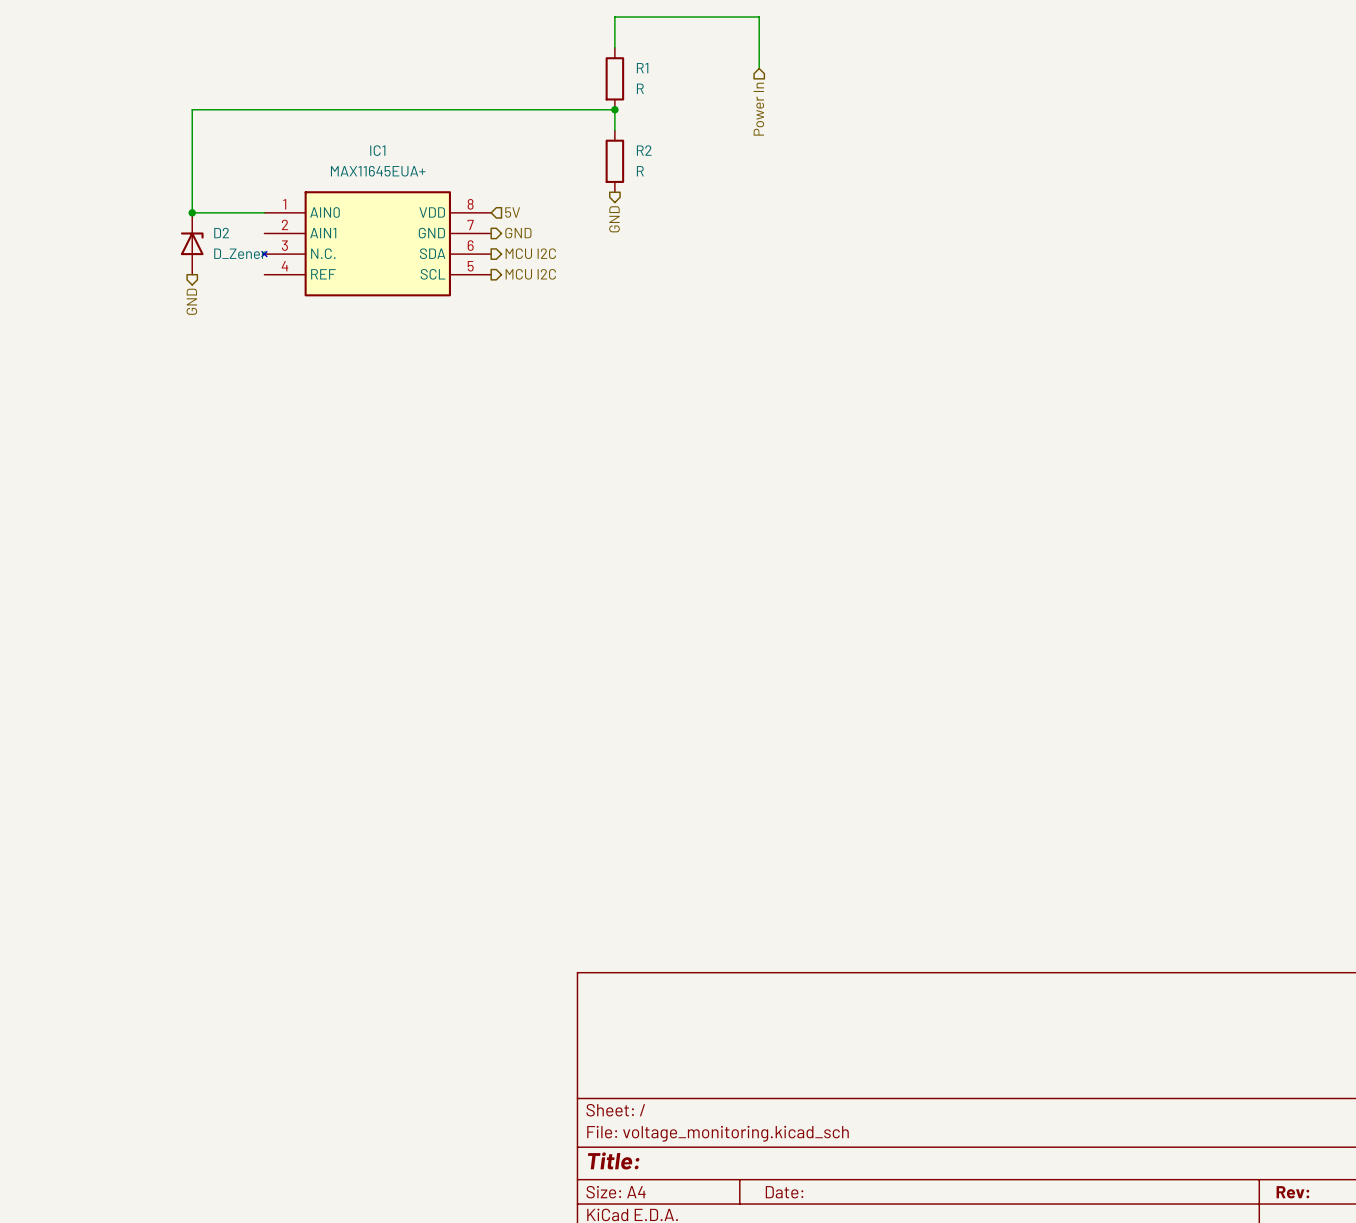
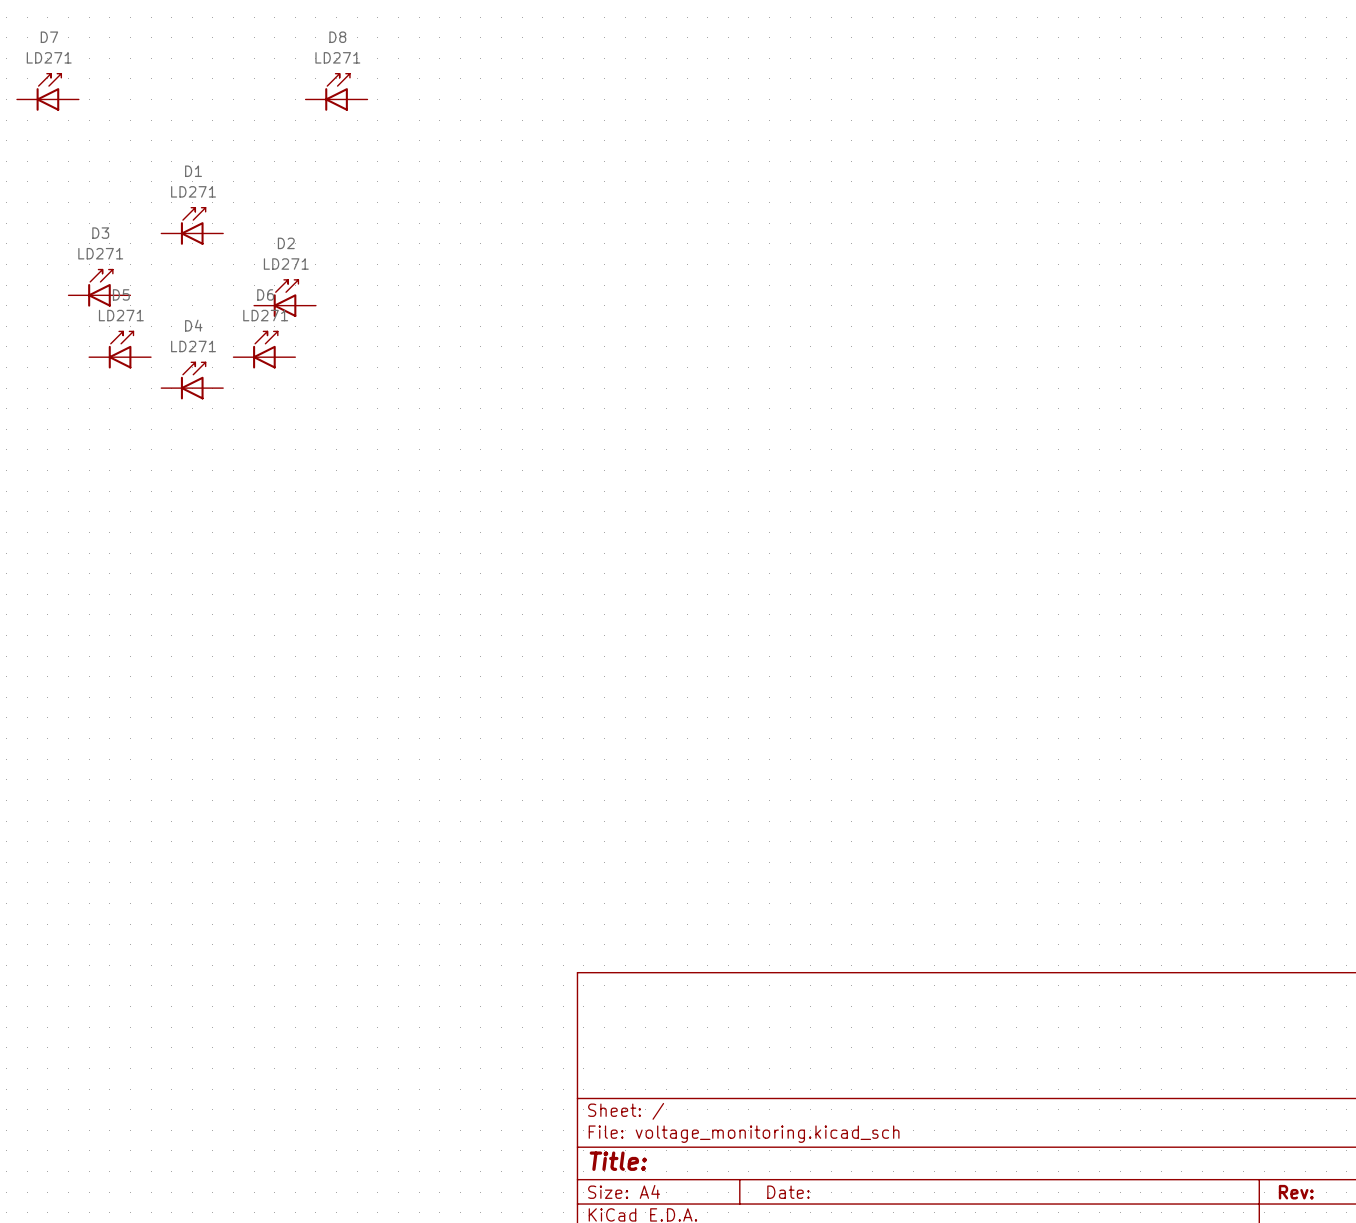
wire: (614, 47) (614, 17) (759, 17) (759, 68) -> none
R1: R (614, 78) -> none
D7: none -> LD271 (47, 92)
D8: none -> LD271 (336, 92)
junction: (614, 109) -> none
hierarchical label: Power In (758, 109) -> none
wire: (614, 130) (614, 109) (192, 109) (192, 212) (264, 212) -> none
R2: R (614, 161) -> none
D2 symbol: [180, 212, 204, 275] -> [254, 279, 316, 317]
junction: (192, 212) -> none
hierarchical label: 5V (512, 212) -> none
hierarchical label: GND (614, 219) -> none
D1: none -> LD271 (192, 226)
D2 name position: D2 (221, 233) -> D2 (286, 243)
hierarchical label: GND (518, 233) -> none
IC1: MAX11645EUA+ (376, 243) -> none
D2 value: D_Zener (240, 253) -> LD271 (286, 264)
hierarchical label: MCU I2C (530, 253) -> none
hierarchical label: MCU I2C (530, 274) -> none
D3: none -> LD271 (99, 288)
hierarchical label: GND (191, 301) -> none
D5: none -> LD271 (120, 349)
D6: none -> LD271 (264, 349)
D4: none -> LD271 (192, 380)

